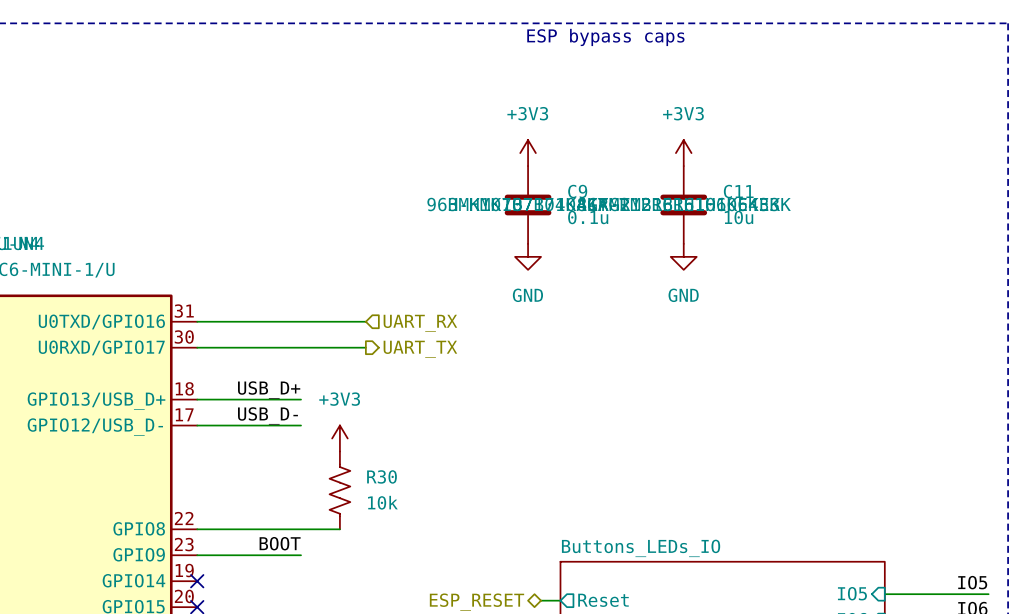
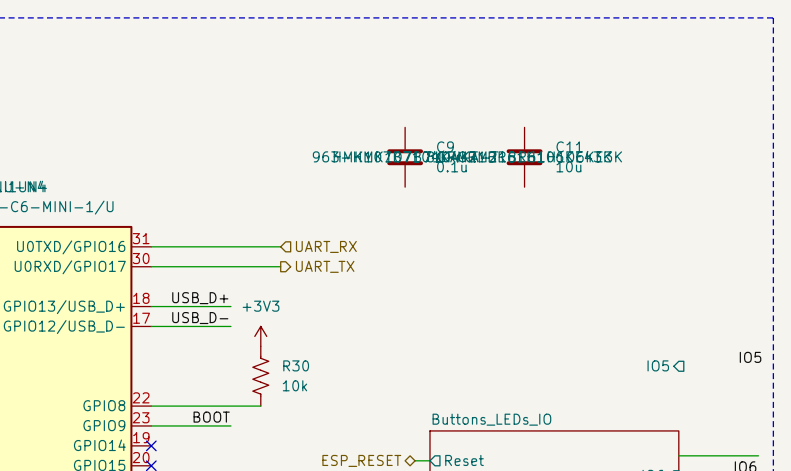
text: ESP bypass caps (605, 37) -> none
power symbol: +3V3 (528, 153) -> none
power symbol: +3V3 (683, 153) -> none
power symbol: GND (528, 256) -> none
power symbol: GND (683, 256) -> none
label position: IO5 (972, 582) -> IO5 (750, 357)
sheet pin position: IO5 (852, 593) -> IO5 (658, 365)

